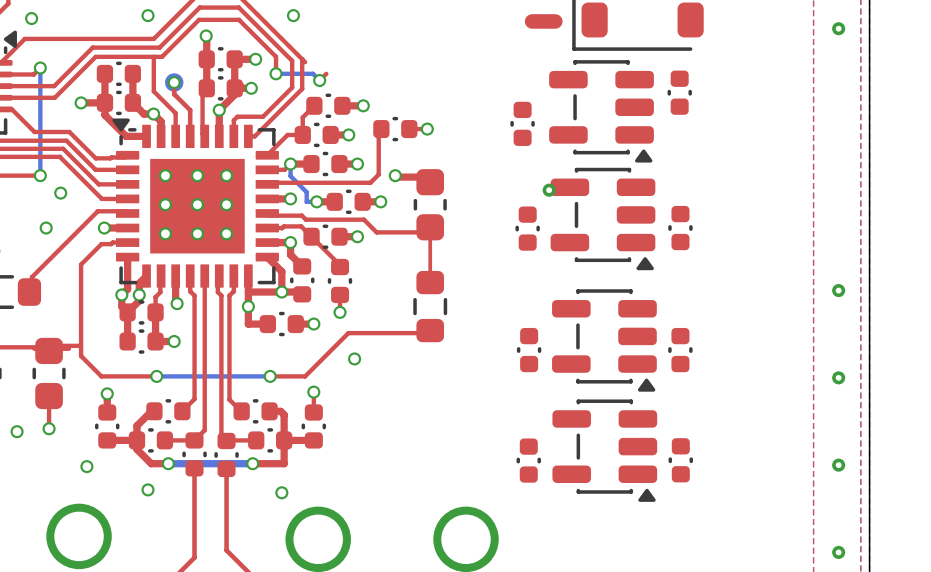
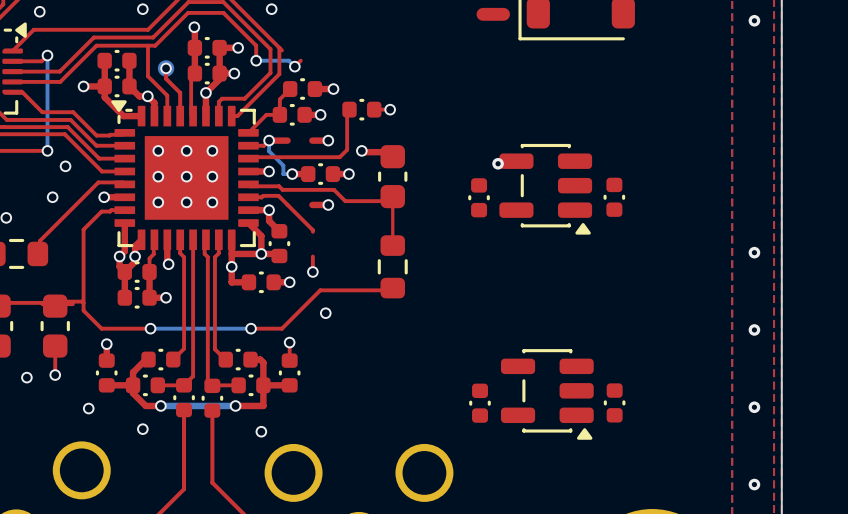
part: (679, 92) -> none
part: (601, 111) -> none
part: (522, 123) -> none
part: (325, 164) -> none
part: (325, 236) -> none
part: (339, 280) -> none
part: (604, 340) -> none
part: (529, 350) -> none
part: (680, 350) -> none

